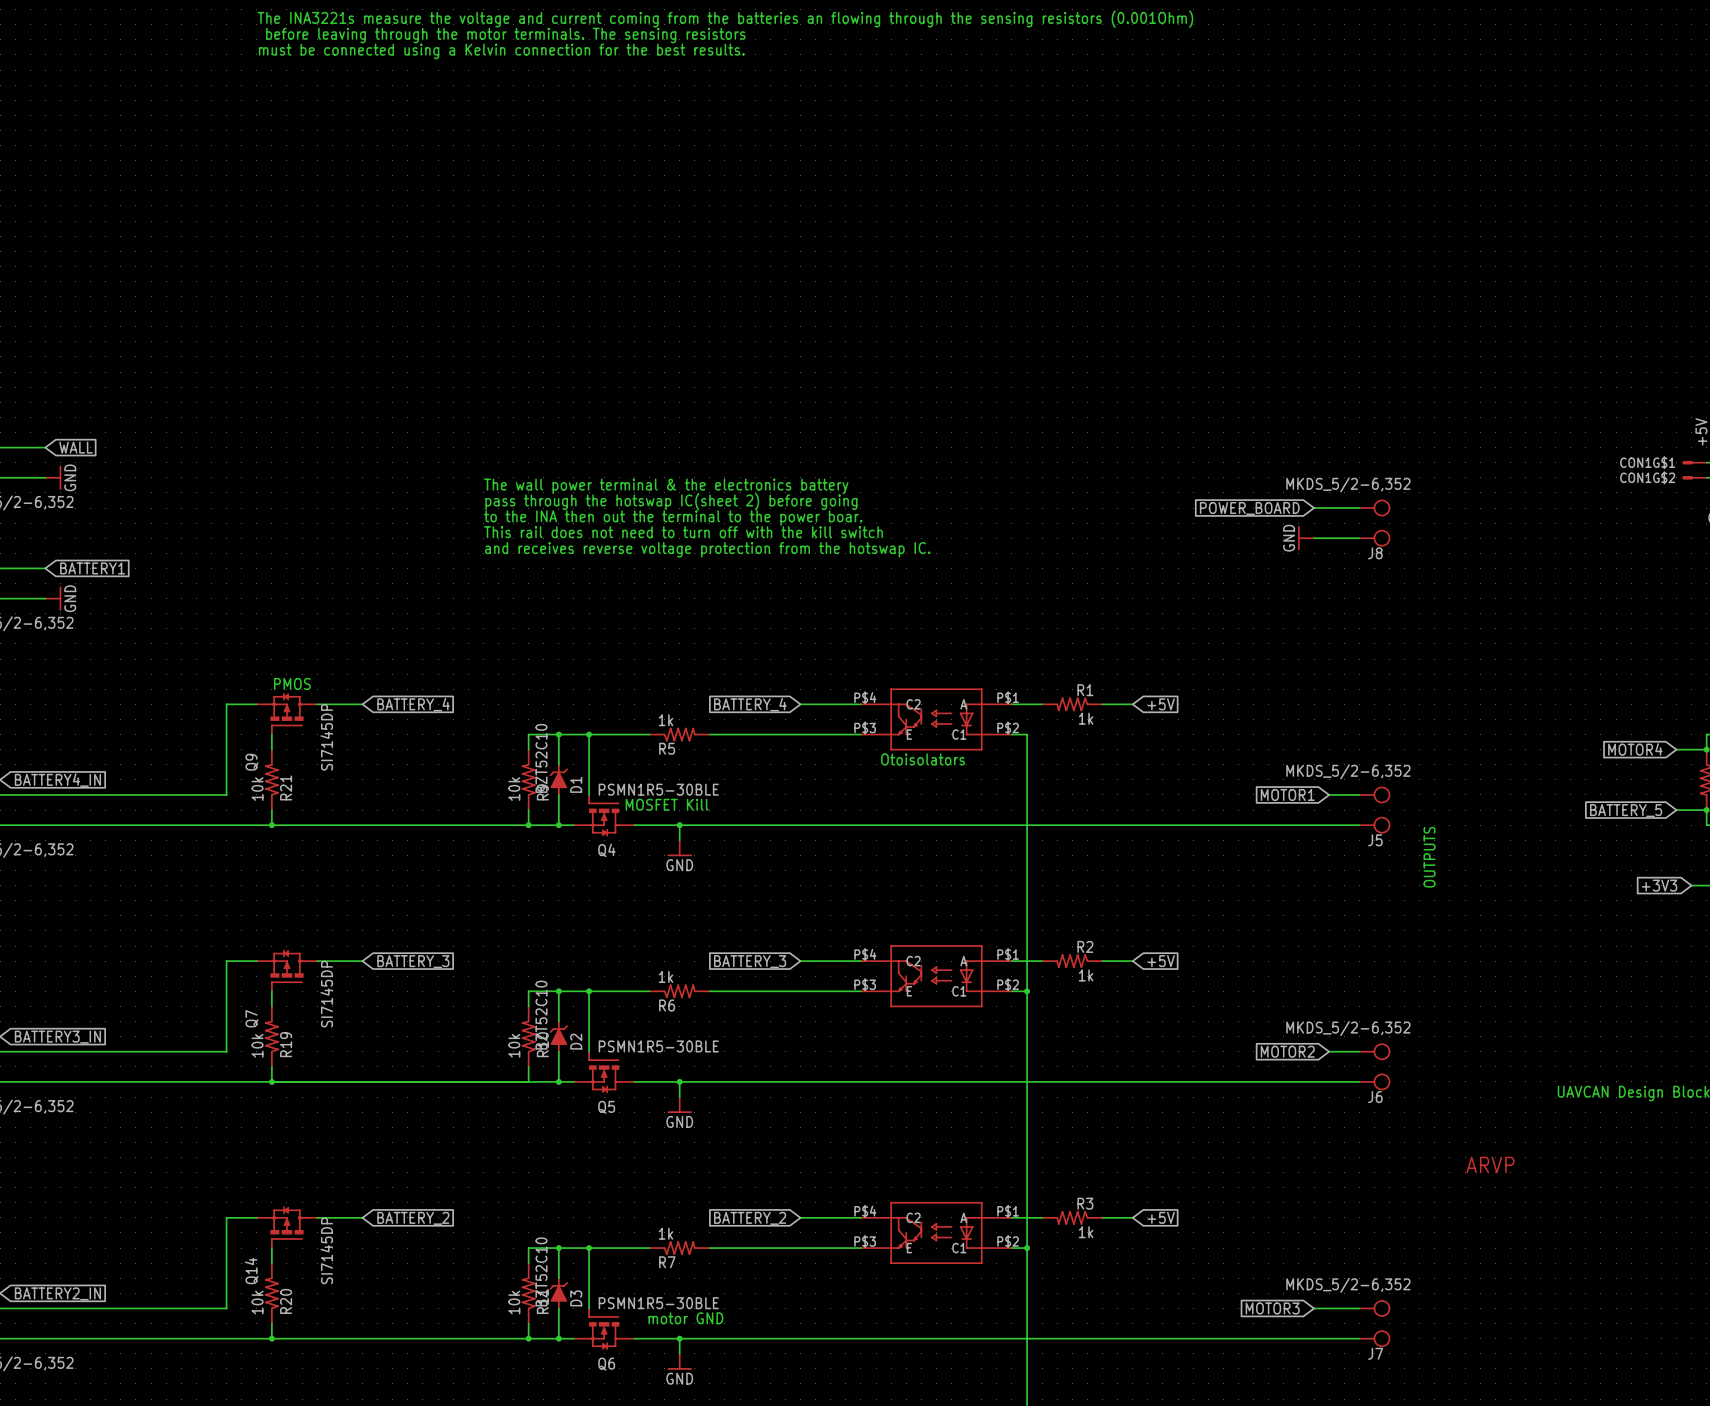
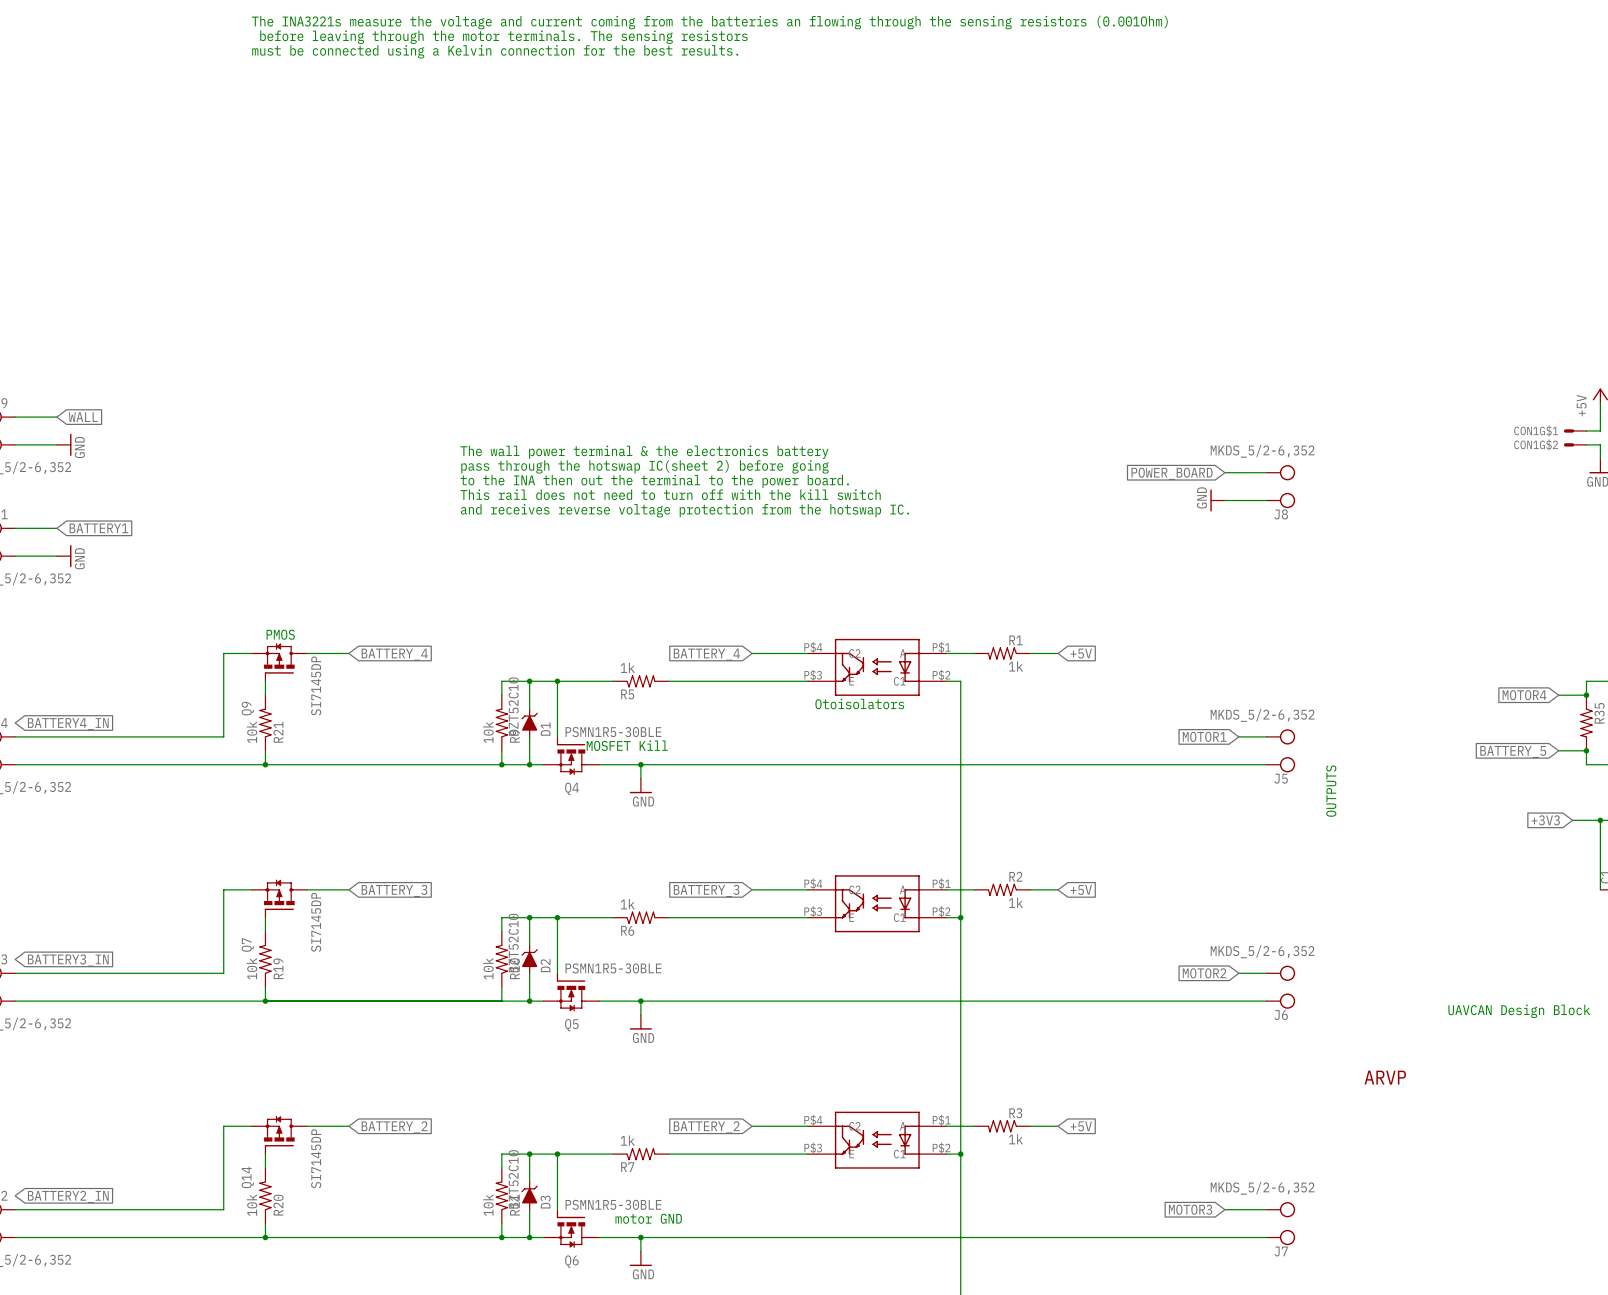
text: to the INA then out the terminal to the power boar. (673, 518) -> to the INA then out the terminal to the power board. (654, 481)

